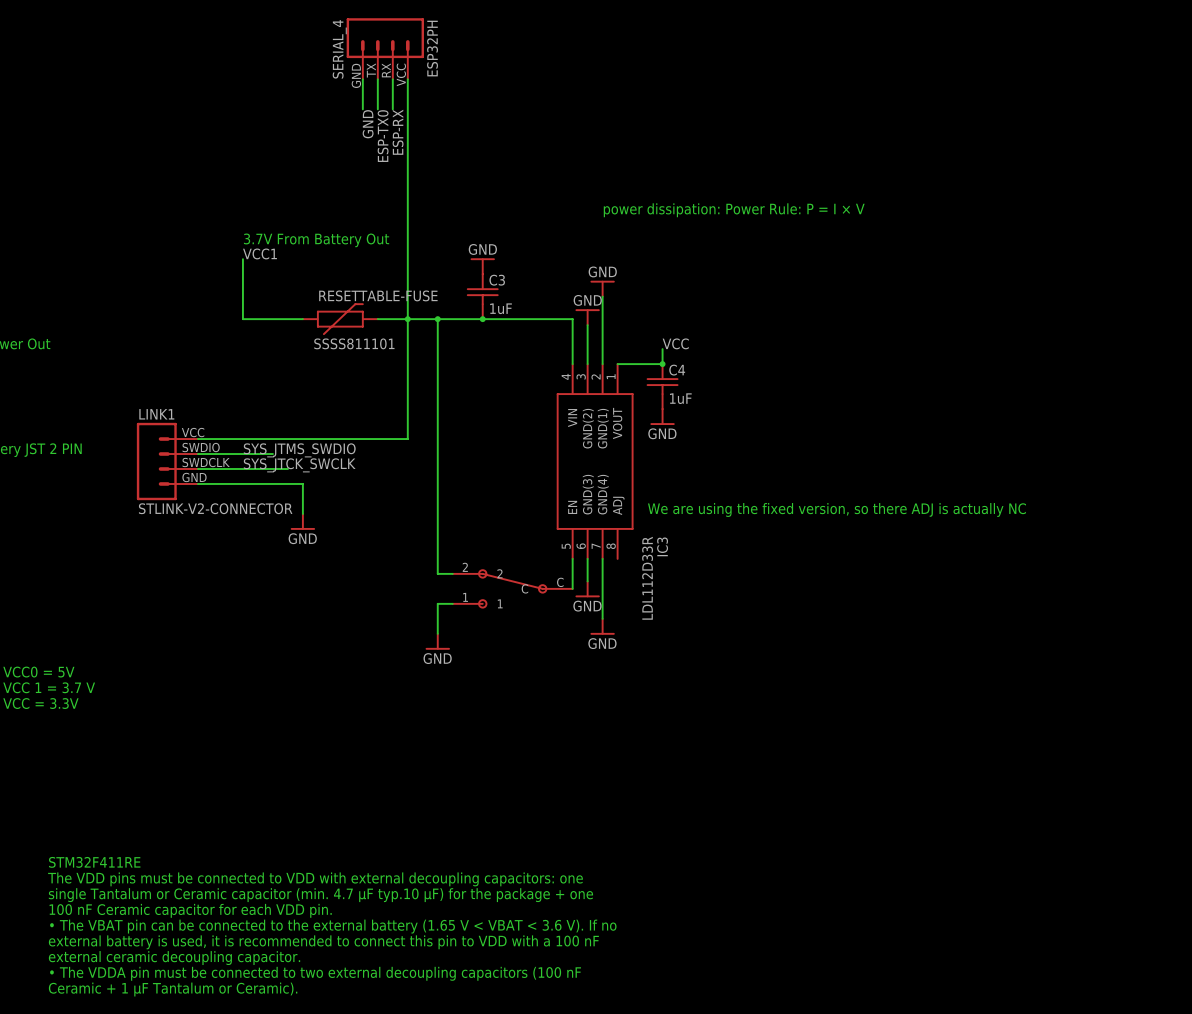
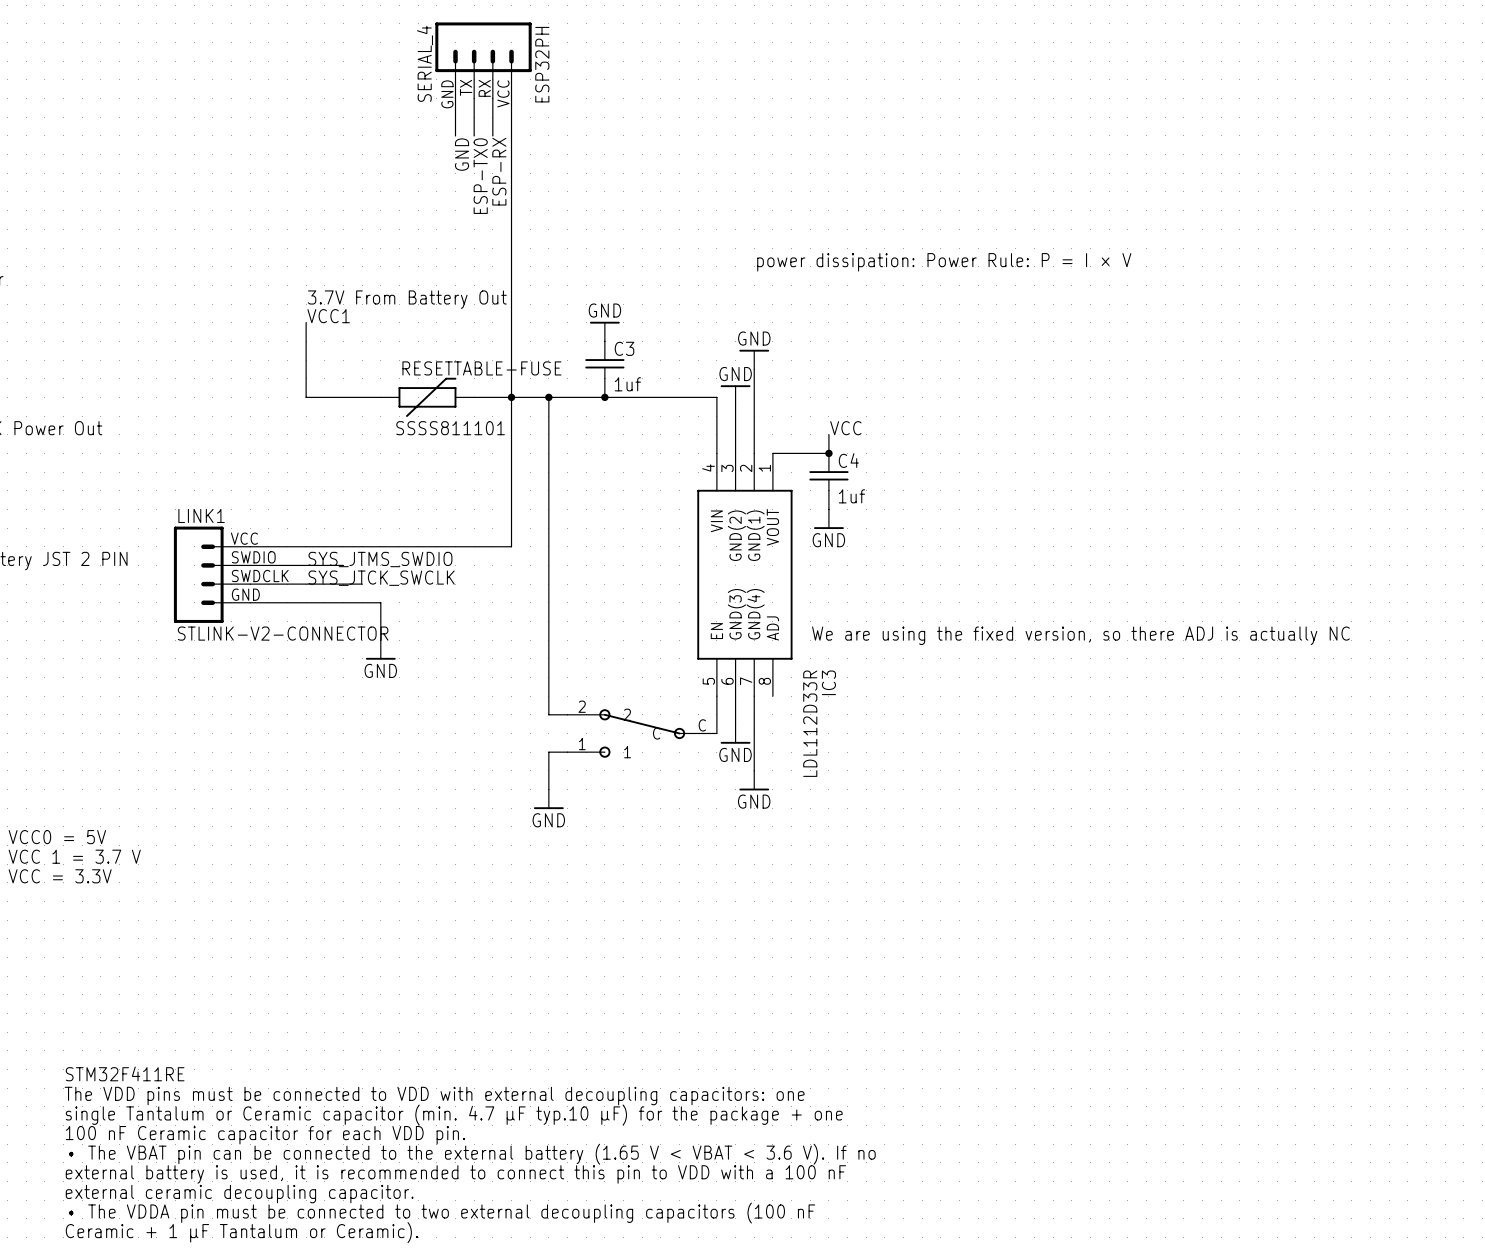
C3 value: 1uF (501, 308) -> 1uf (627, 384)
C4 value: 1uF (680, 398) -> 1uf (851, 496)

